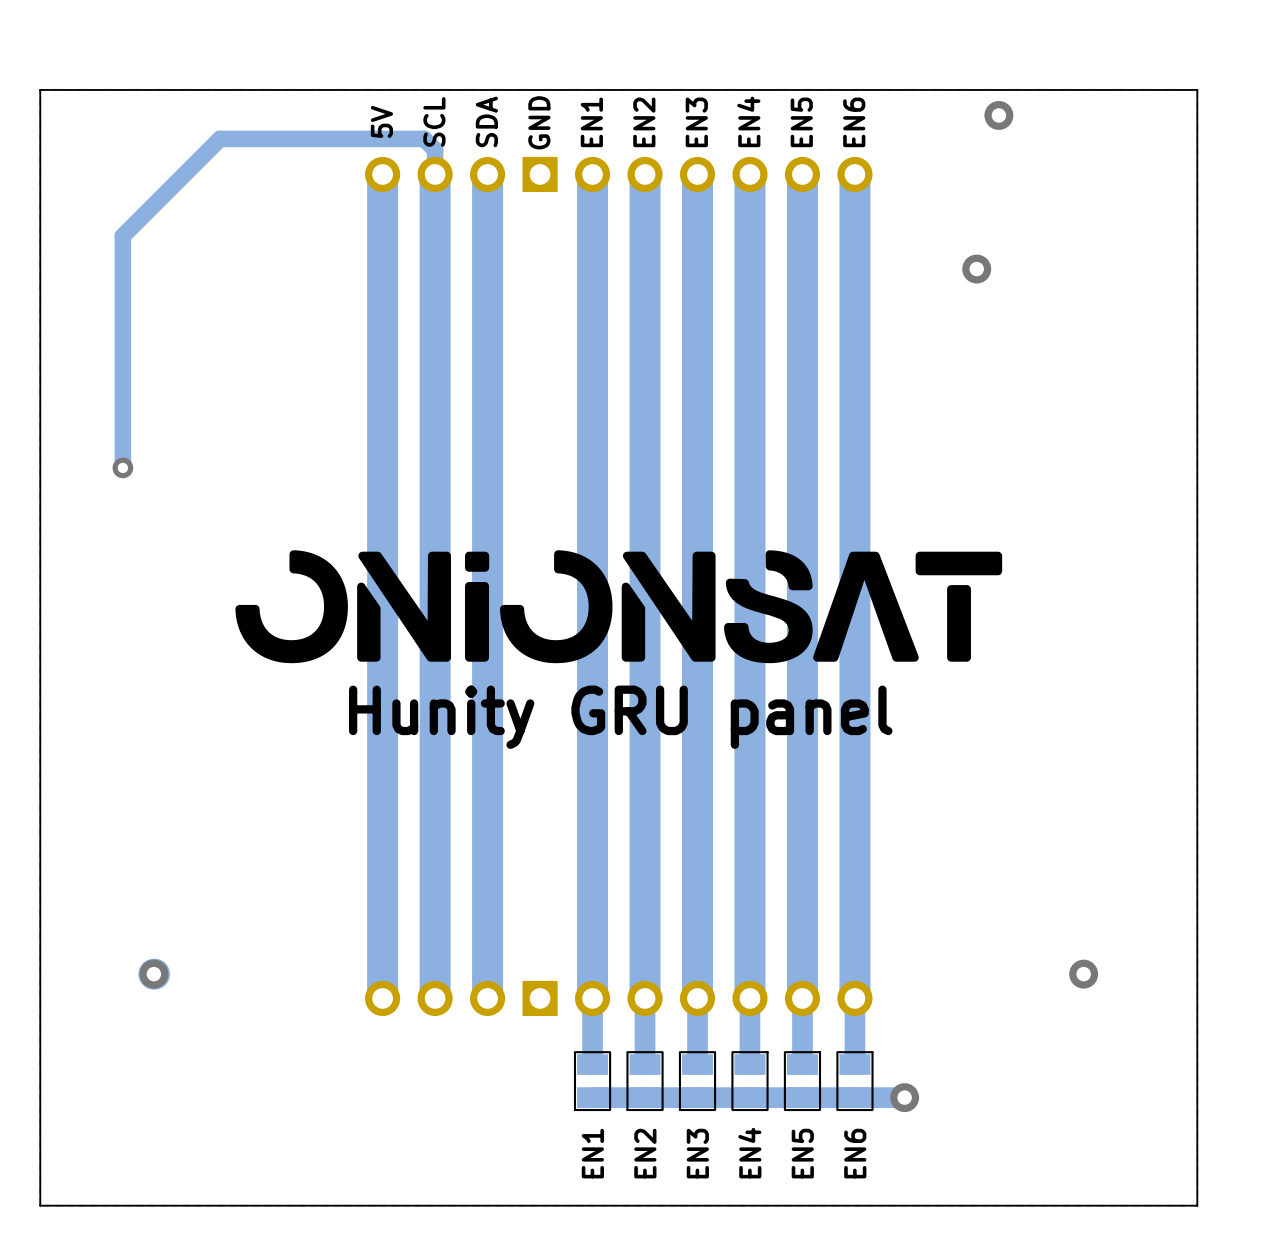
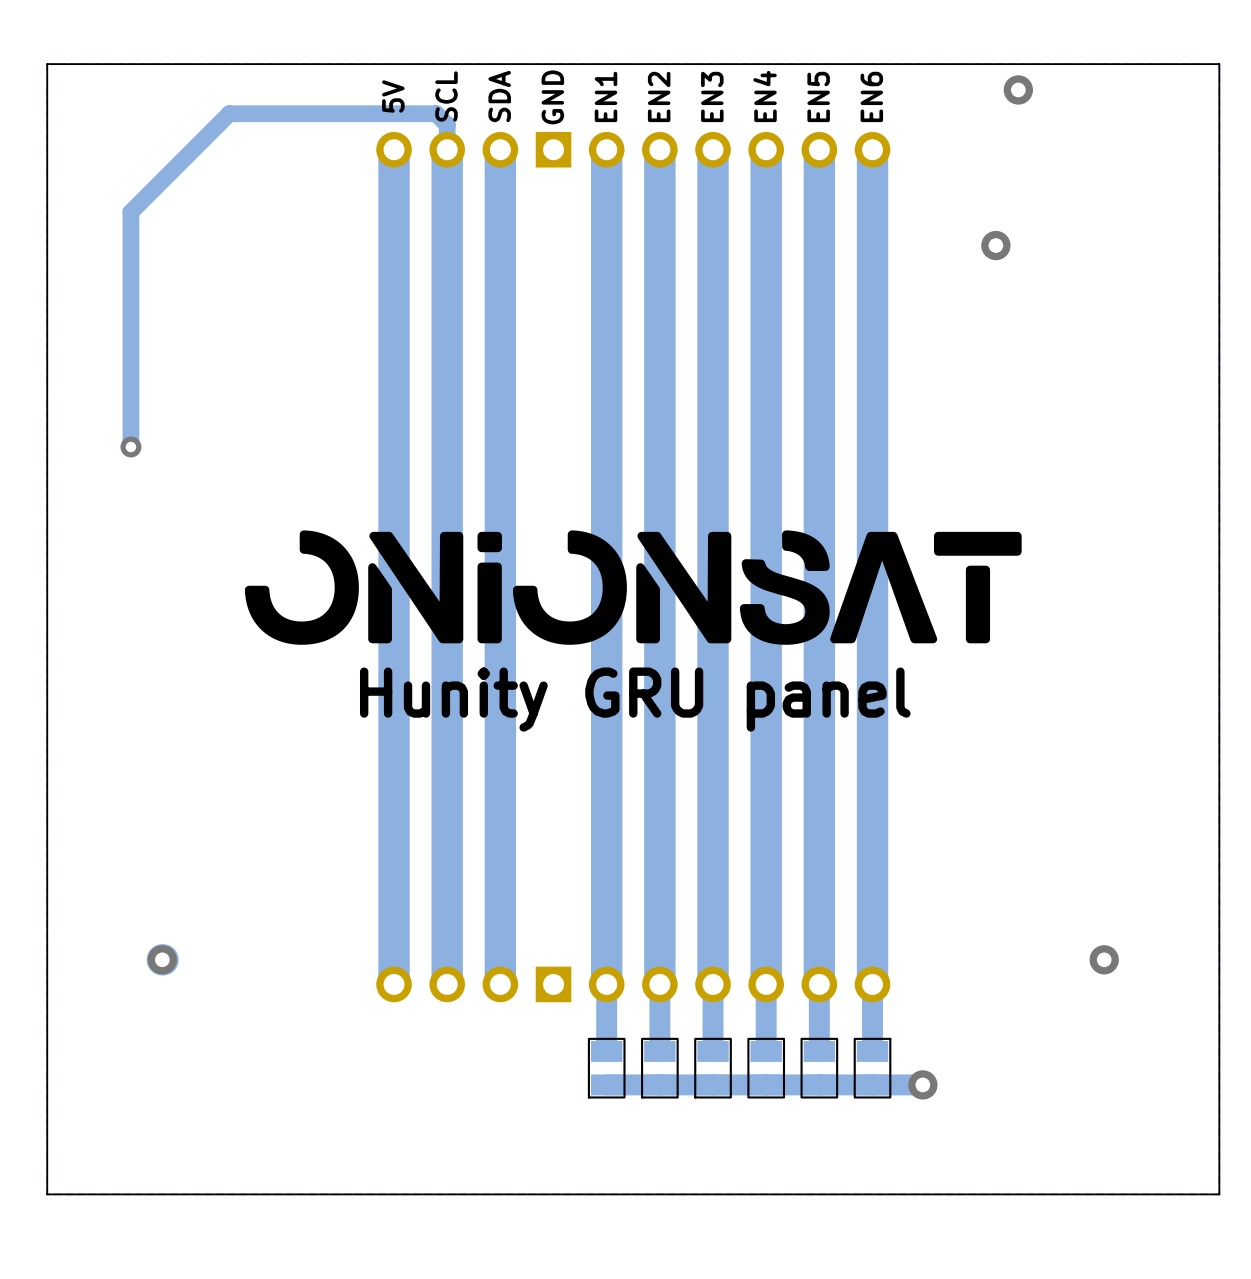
text: EN1 (592, 1153) -> none
text: EN2 (645, 1153) -> none
text: EN3 (697, 1153) -> none
text: EN4 (749, 1153) -> none
text: EN5 (802, 1153) -> none
text: EN6 (855, 1153) -> none

